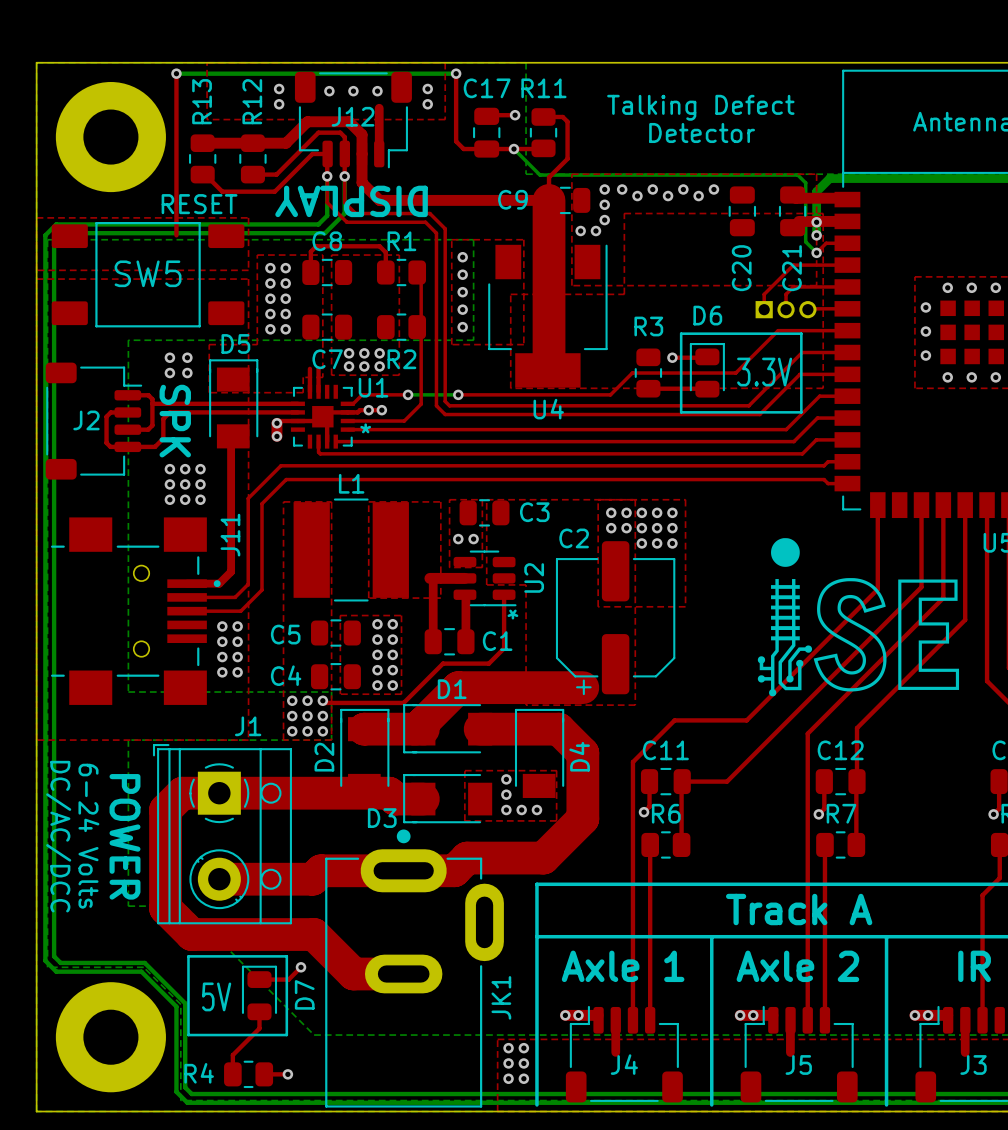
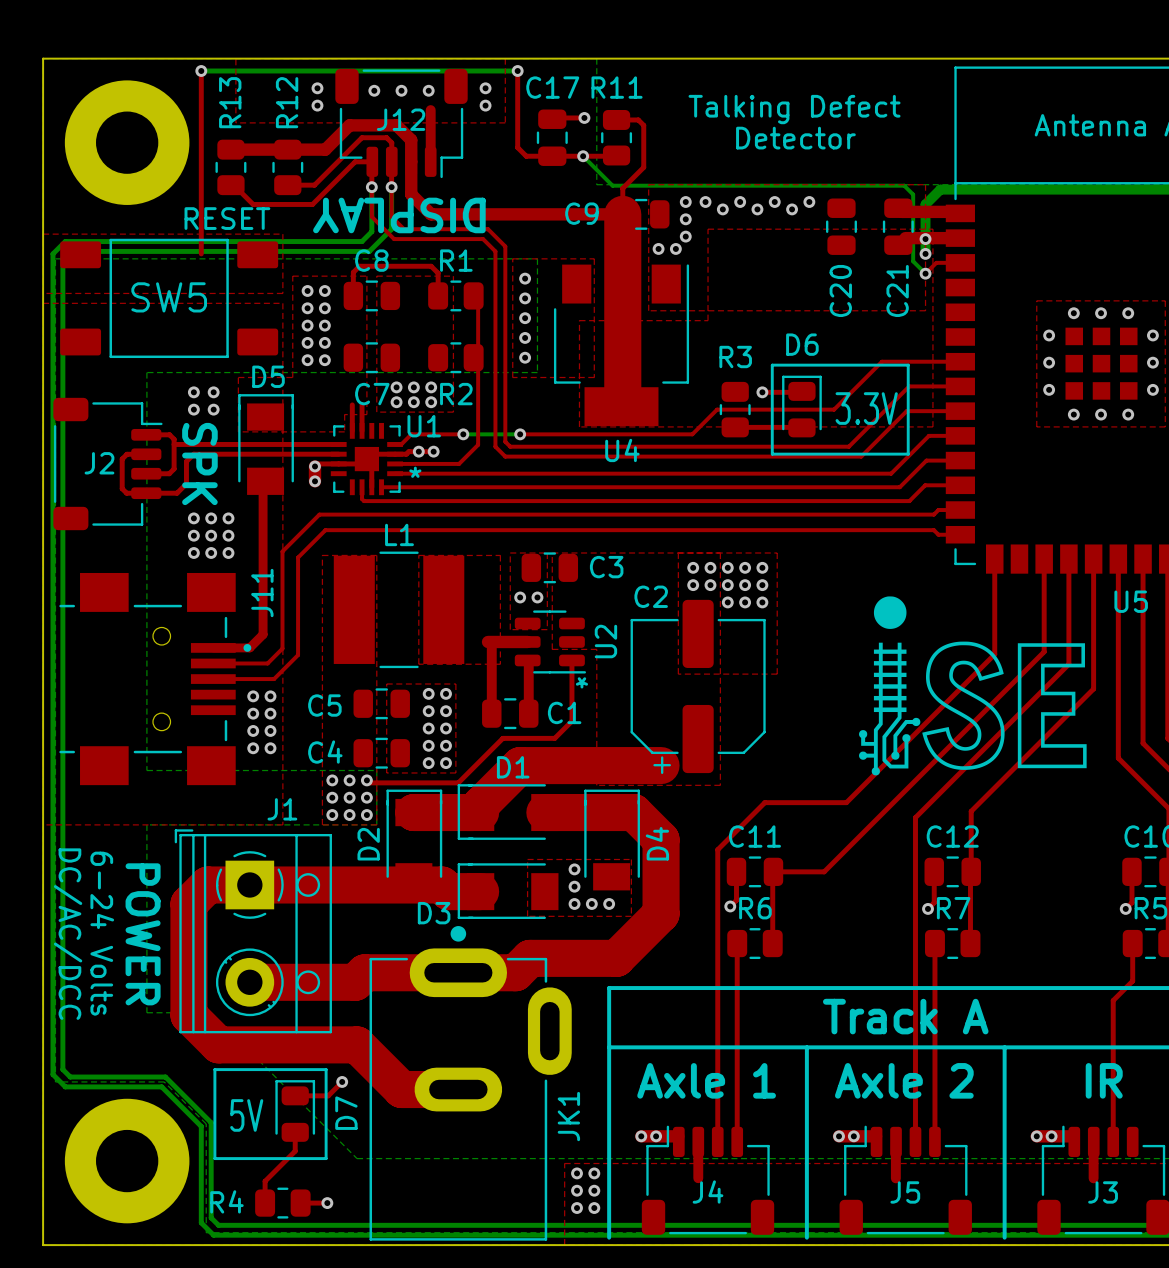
top track: (847, 265) (793, 265) (764, 294) (764, 309) -> none
top track: (847, 286) (793, 286) (786, 294) (786, 309) -> none
top track: (847, 308) (807, 309) -> none
part: (786, 309) -> none

